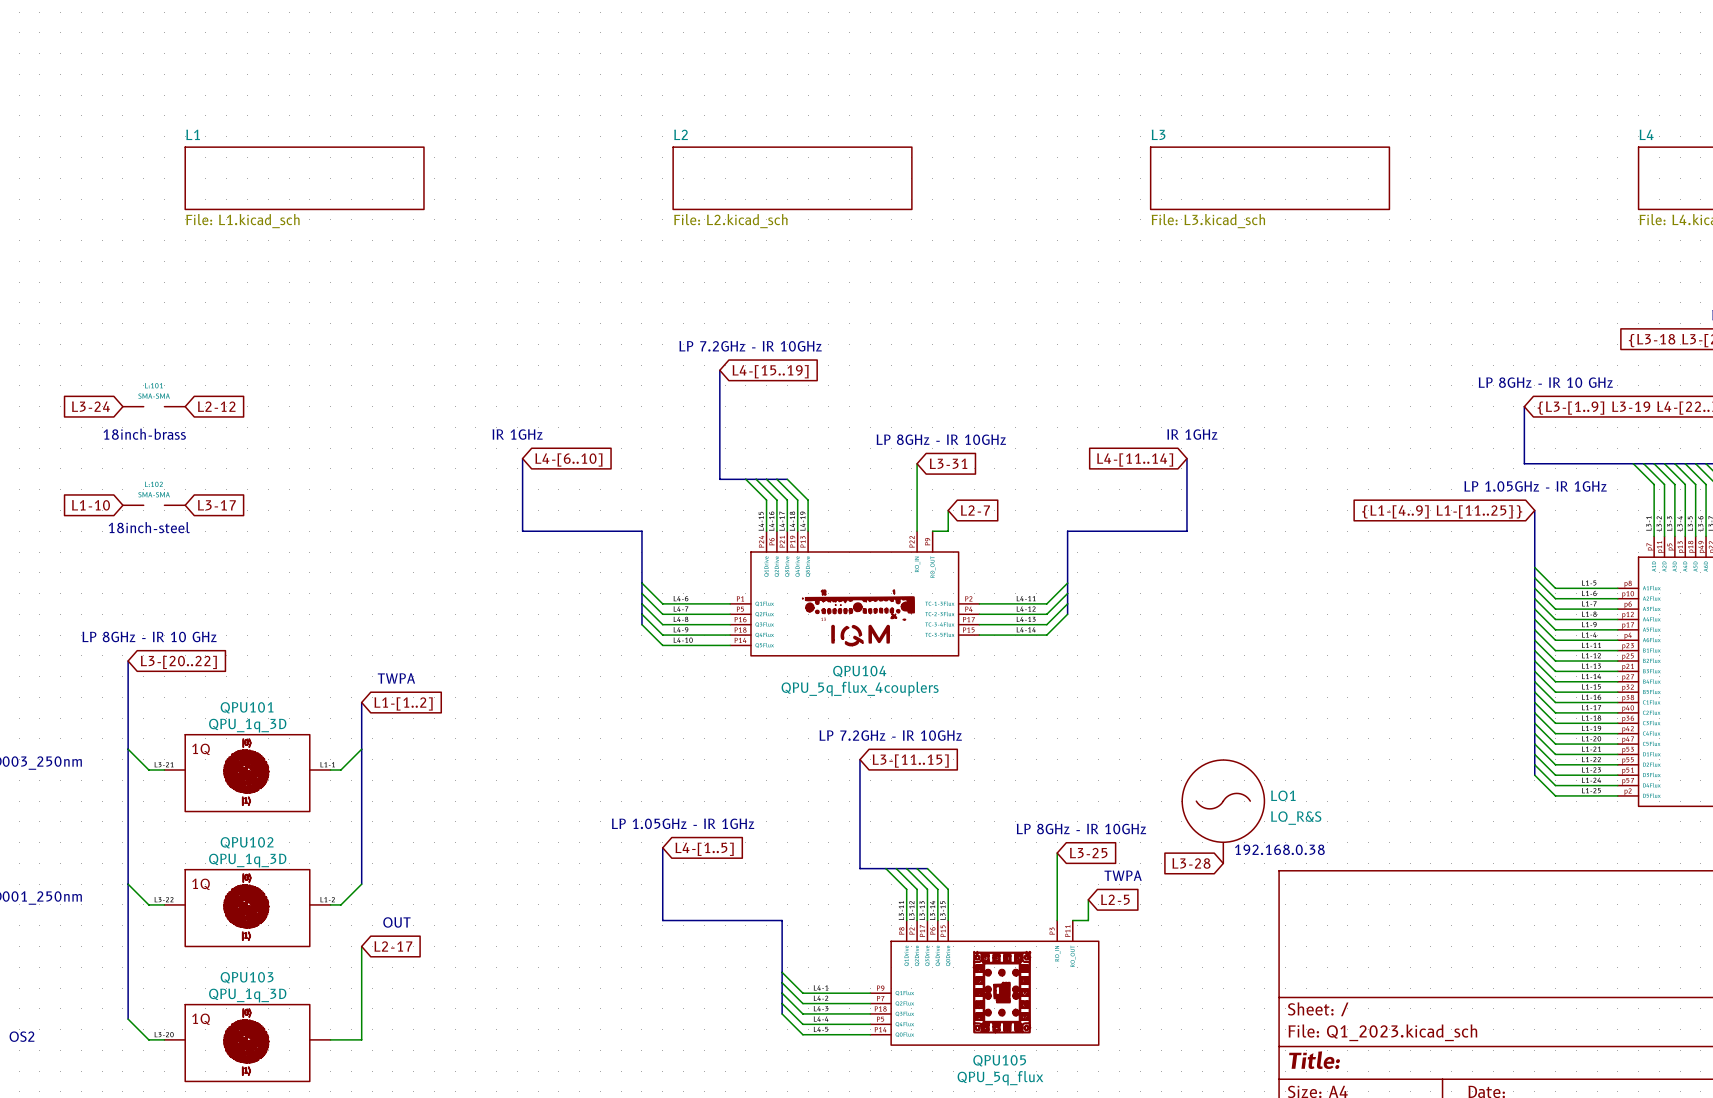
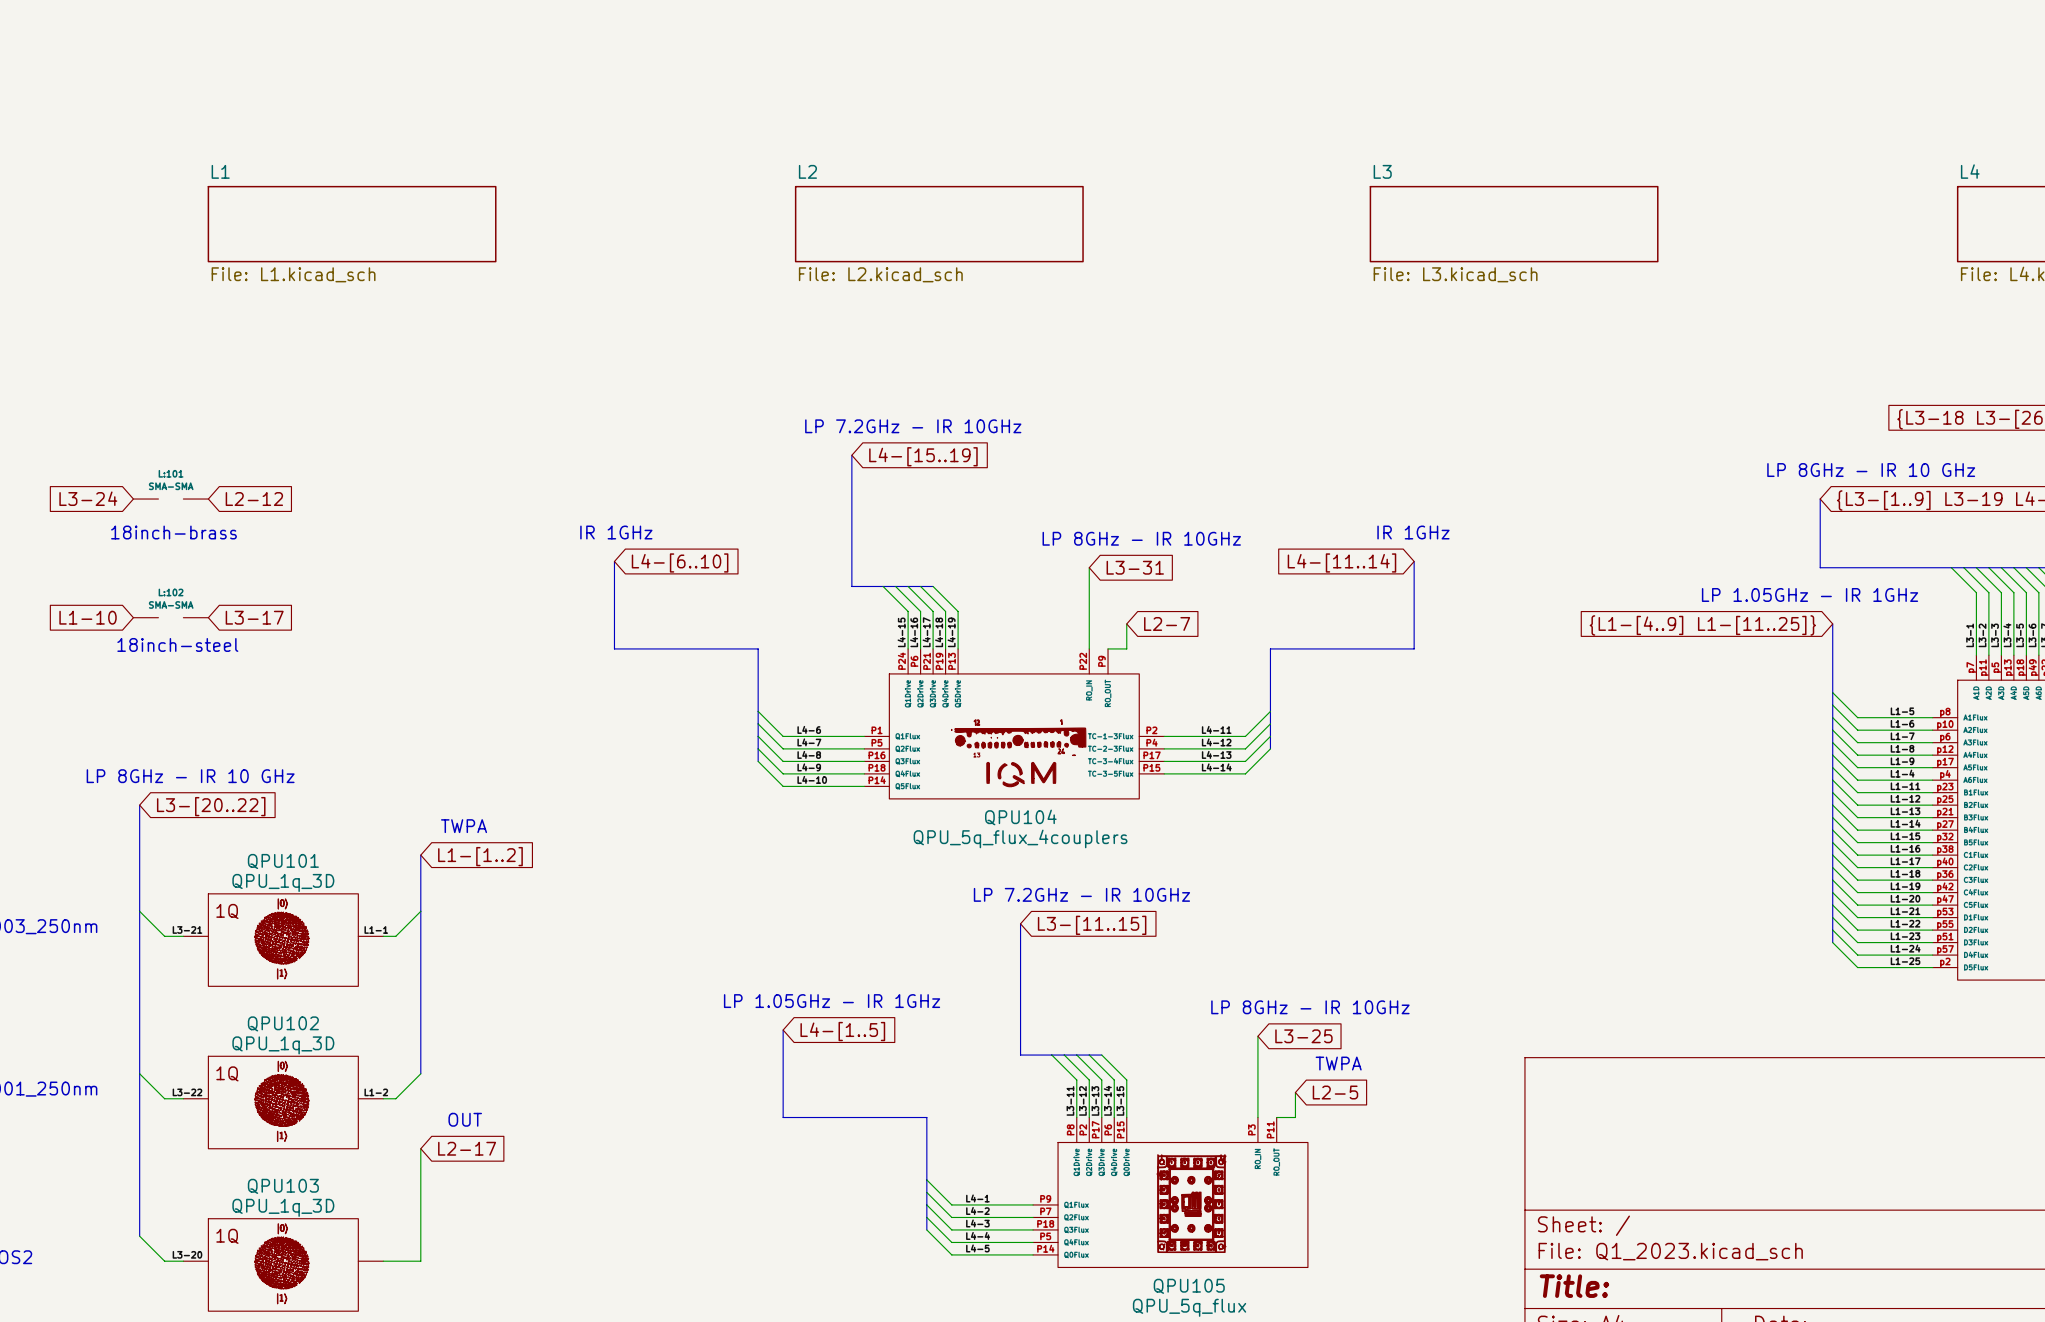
LO1: LO_R&S (1223, 811) -> none
text: 192.168.0.38 (1279, 849) -> none
global label: L3-28 (1191, 863) -> none

